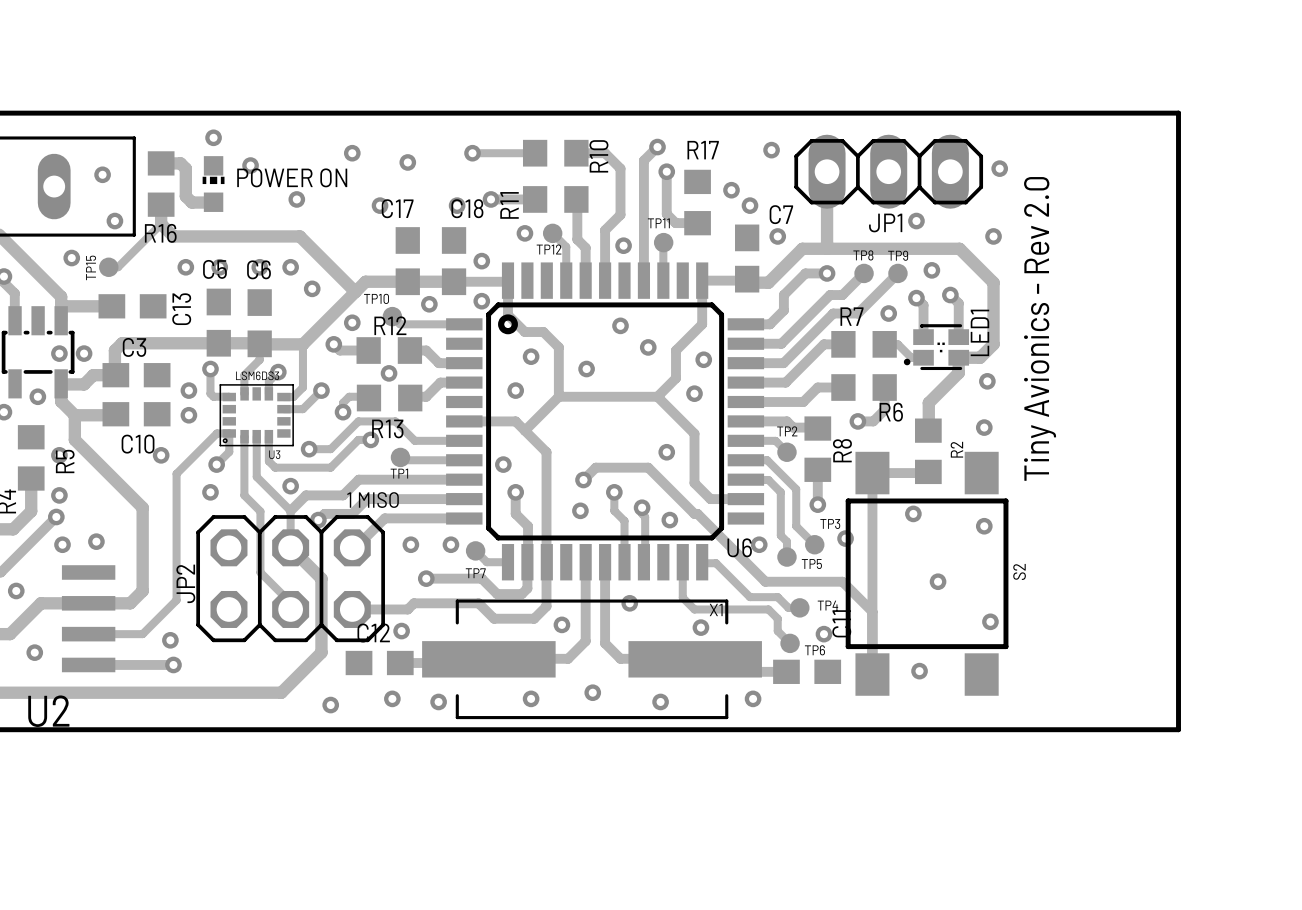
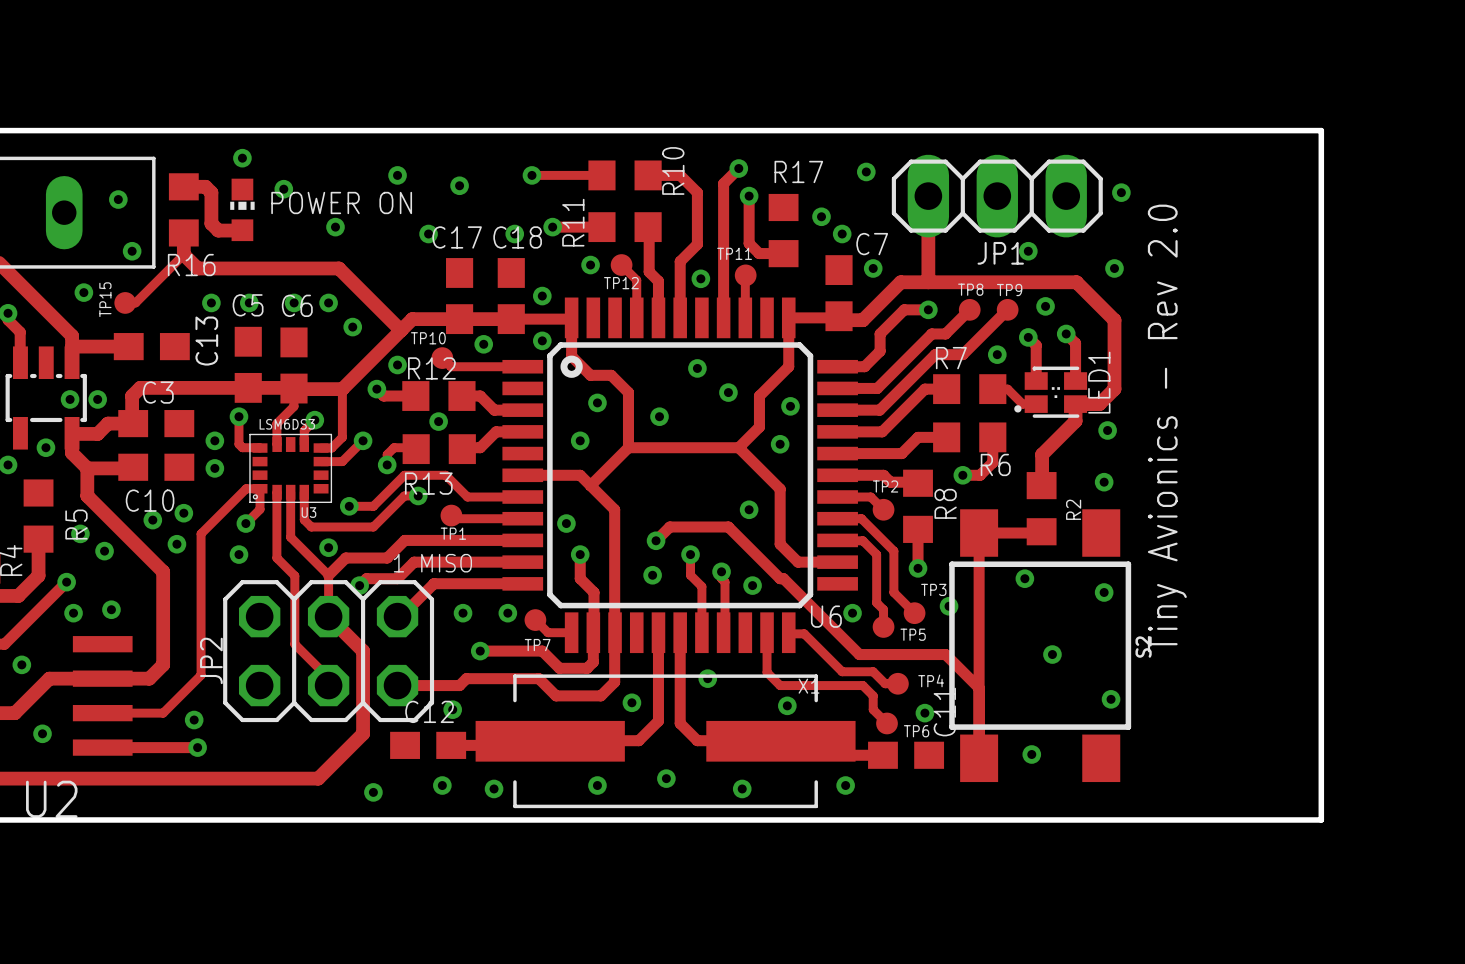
via: (59, 455) -> none
via: none -> (152, 520)
via: none -> (80, 533)
via: none -> (176, 544)
via: none -> (104, 551)
via: (59, 495) -> none

